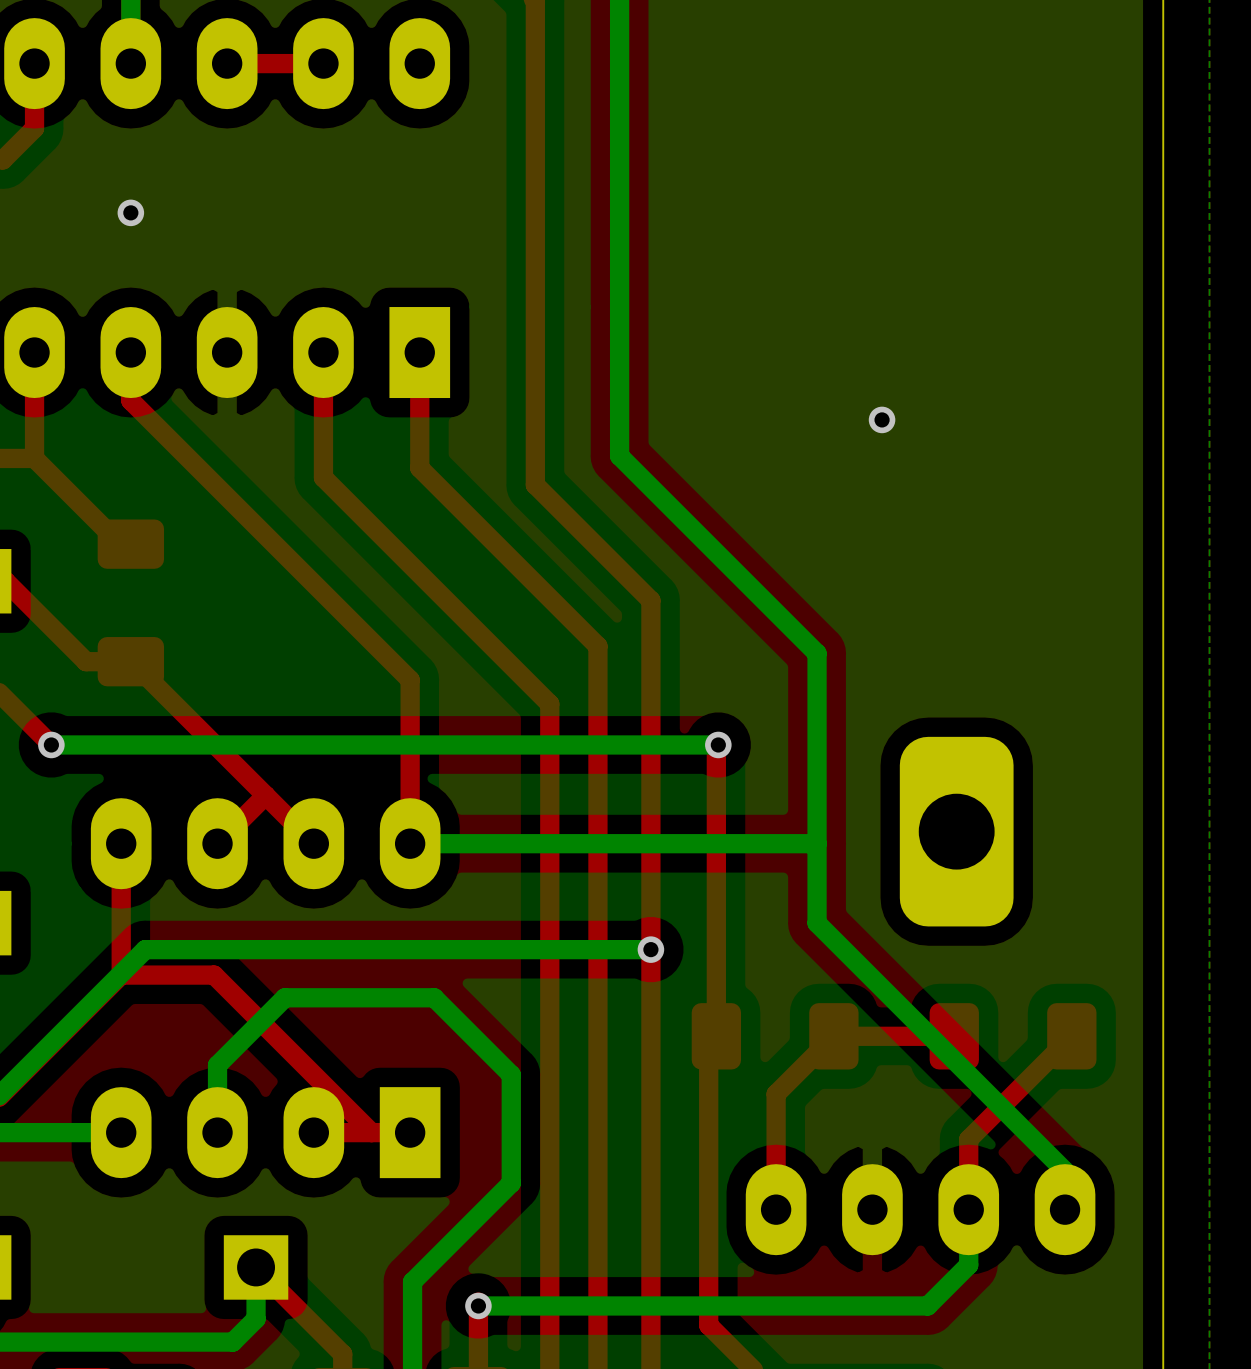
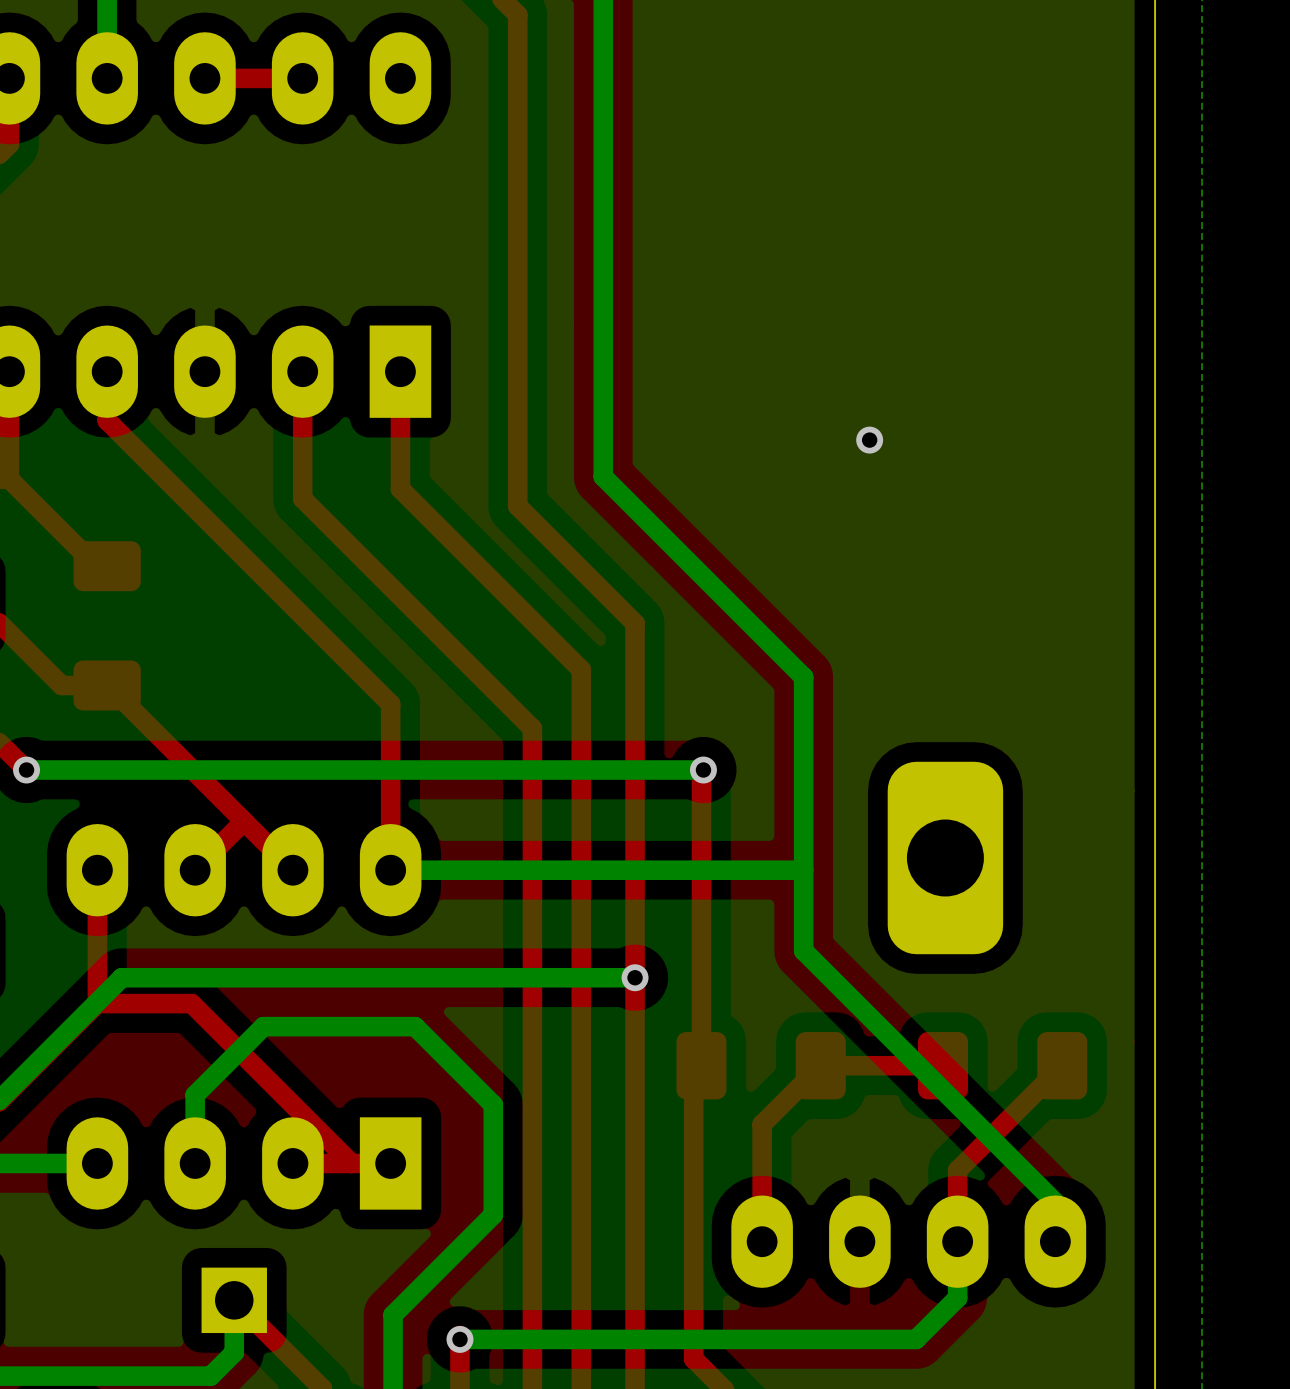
via: (130, 212) -> none

